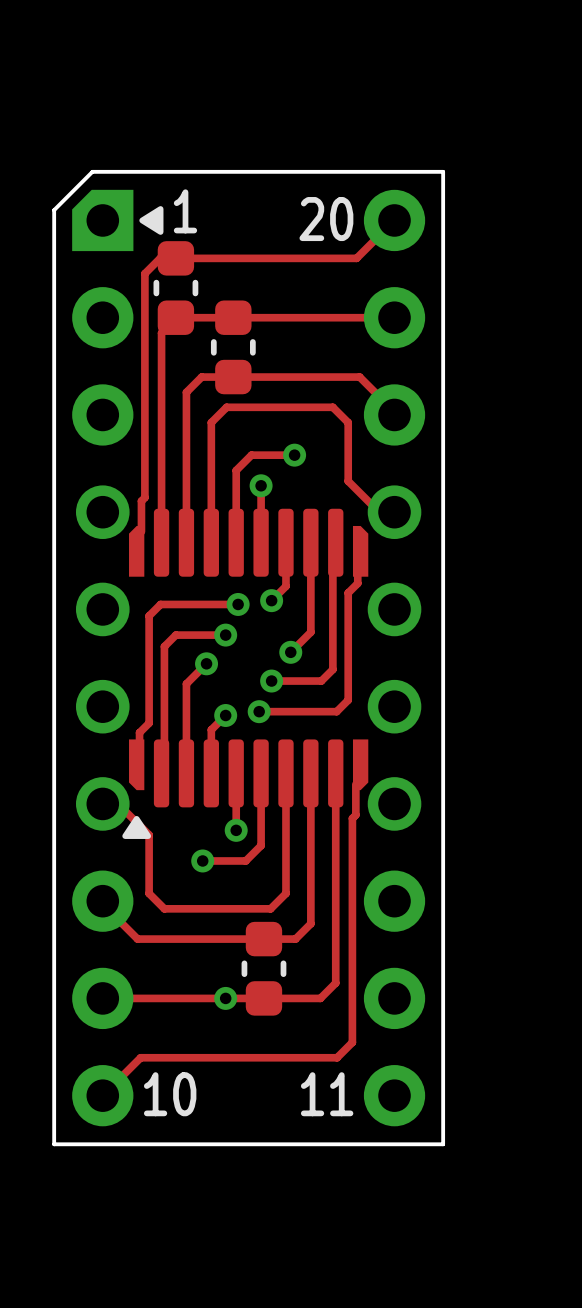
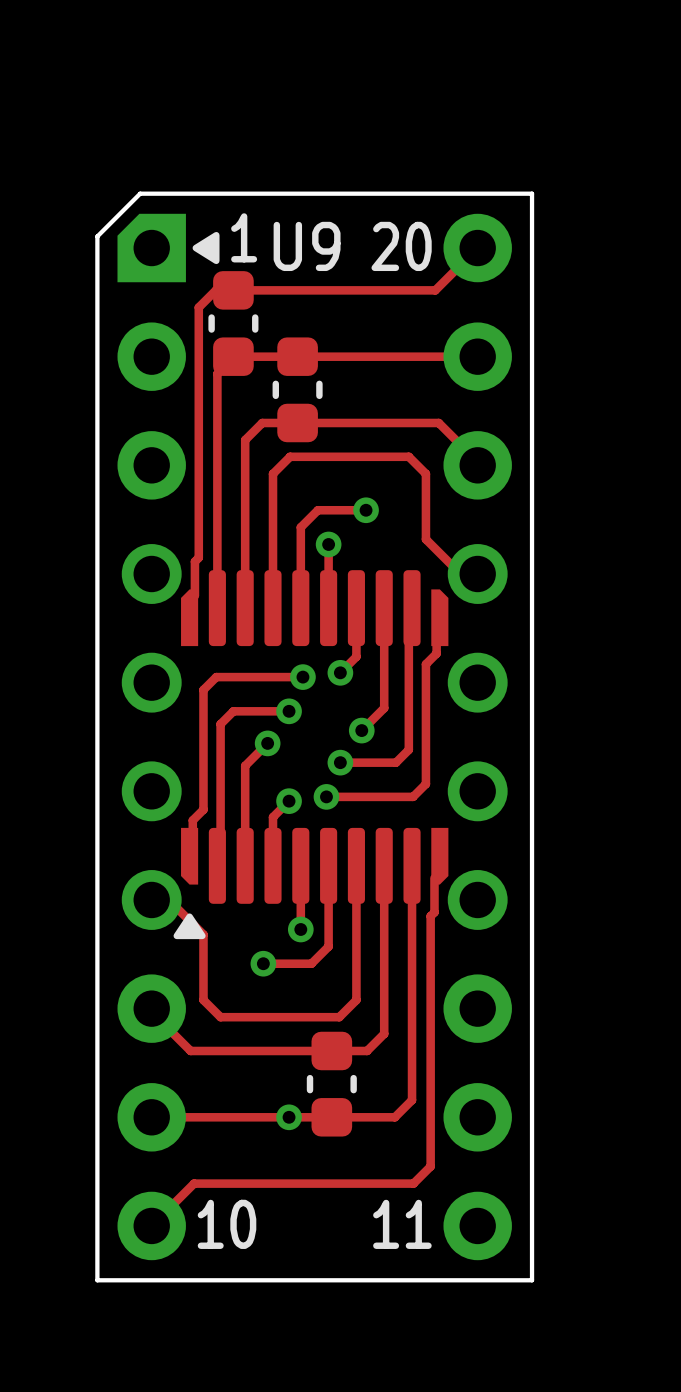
text: none -> U9 (307, 246)

